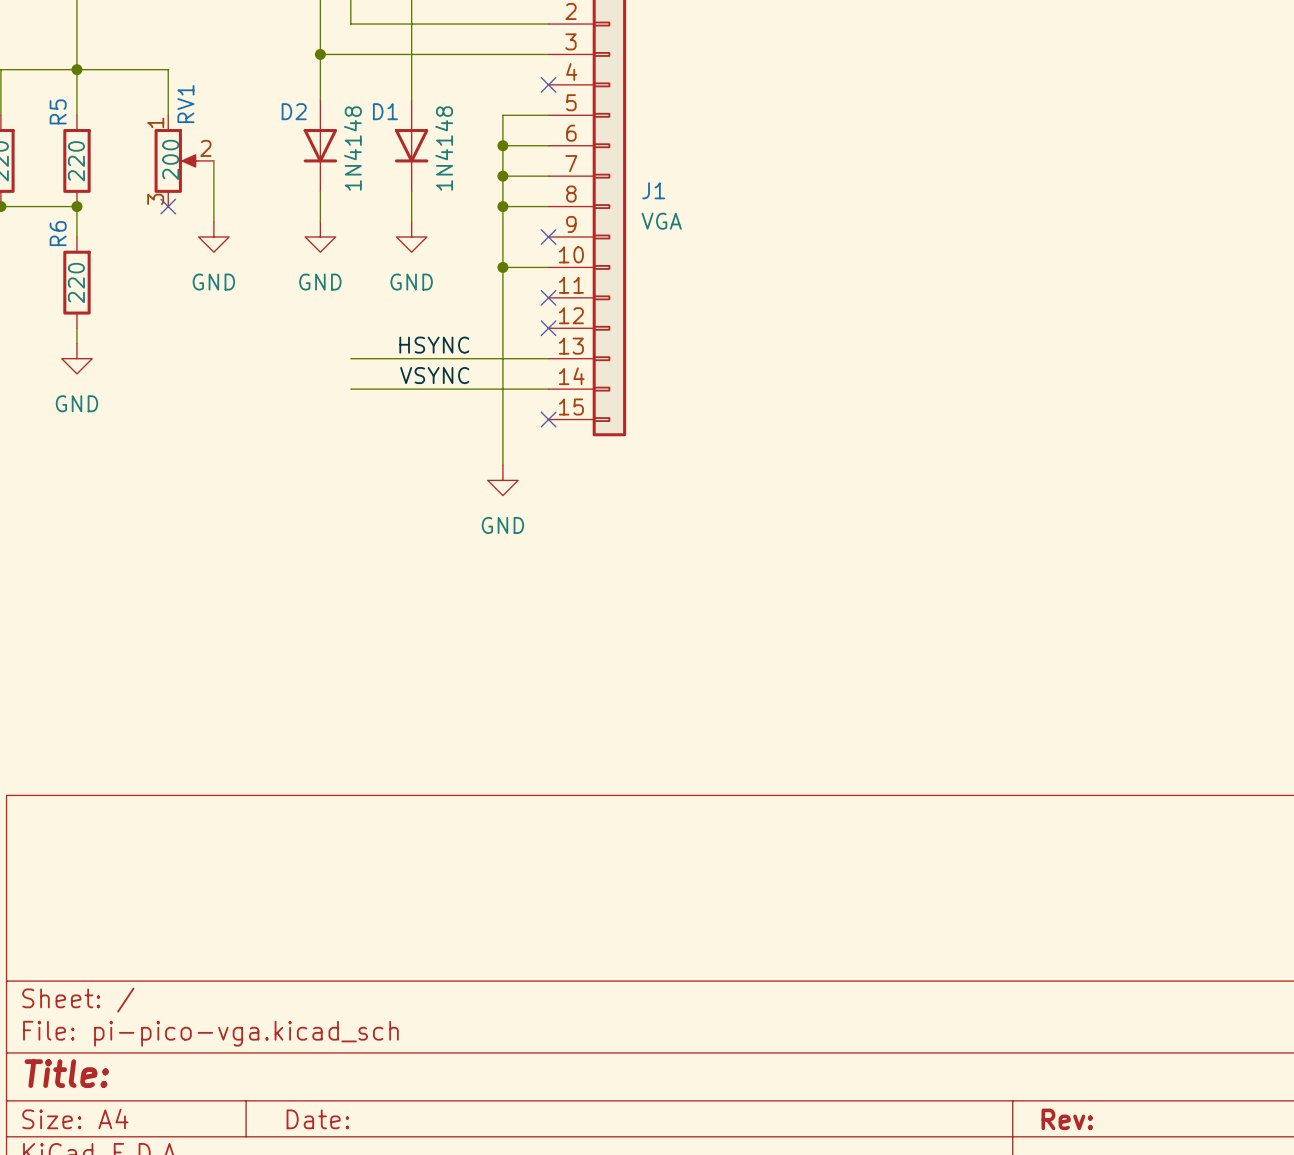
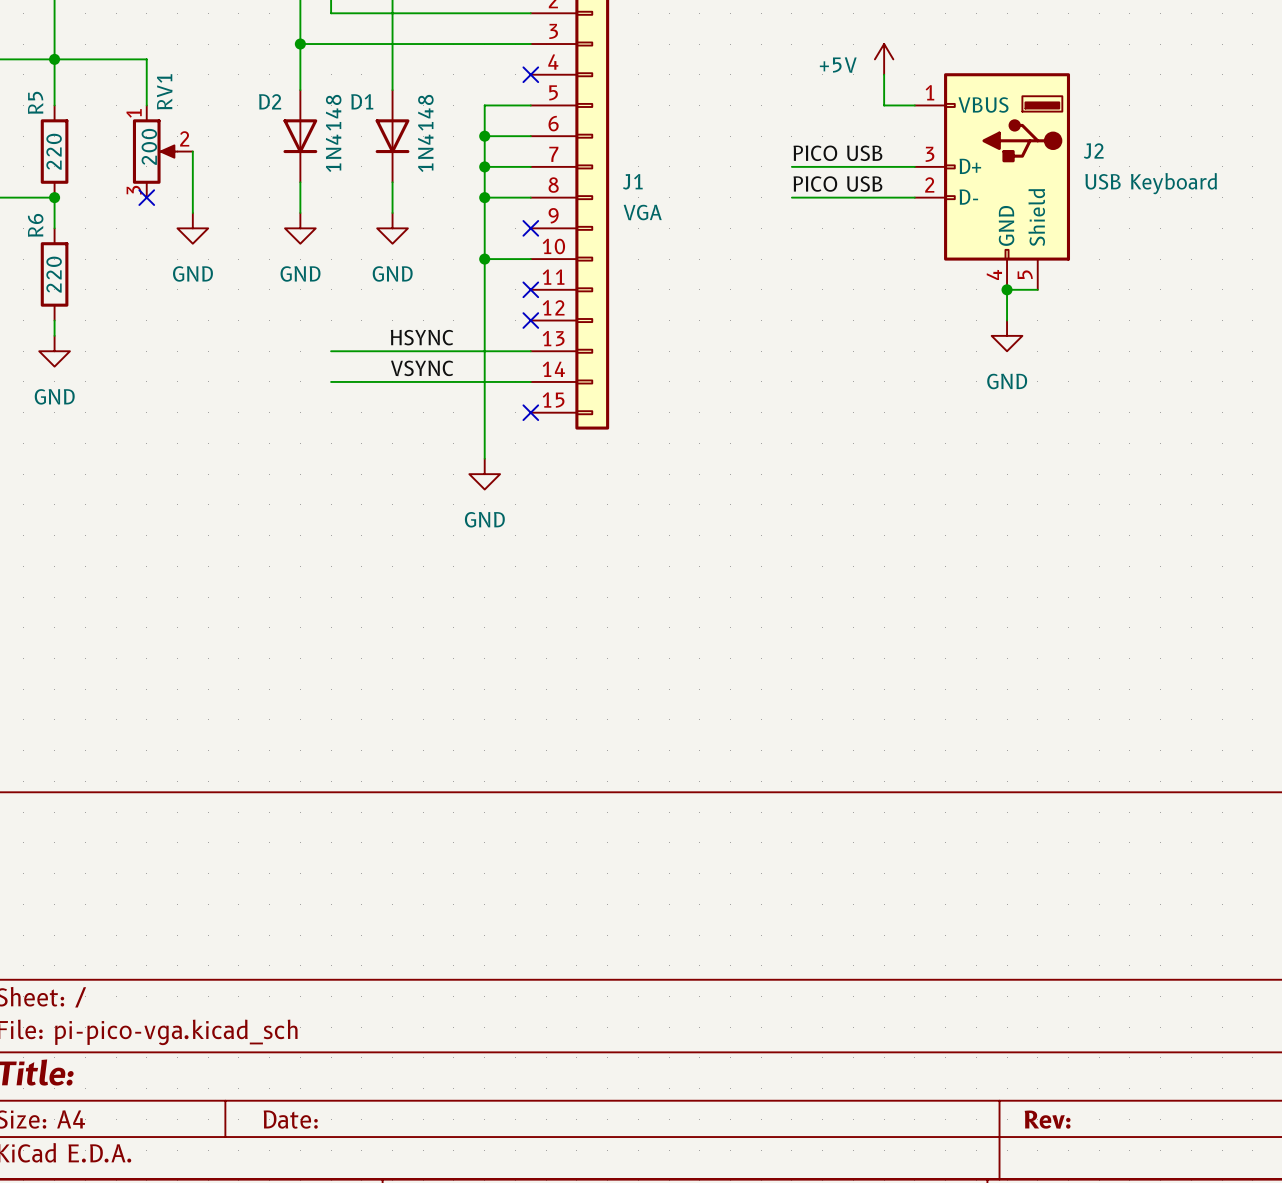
power symbol: none -> +5V (884, 59)
wire: none -> (884, 74) (884, 105) (914, 105)
label: none -> PICO USB (837, 153)
wire: none -> (791, 166) (914, 166)
J2: none -> USB Keyboard (992, 181)
label: none -> PICO USB (837, 184)
wire: none -> (791, 197) (914, 197)
junction: none -> (1007, 289)
wire: none -> (1037, 289) (1007, 289) (1007, 320)
power symbol: none -> GND (1007, 335)

